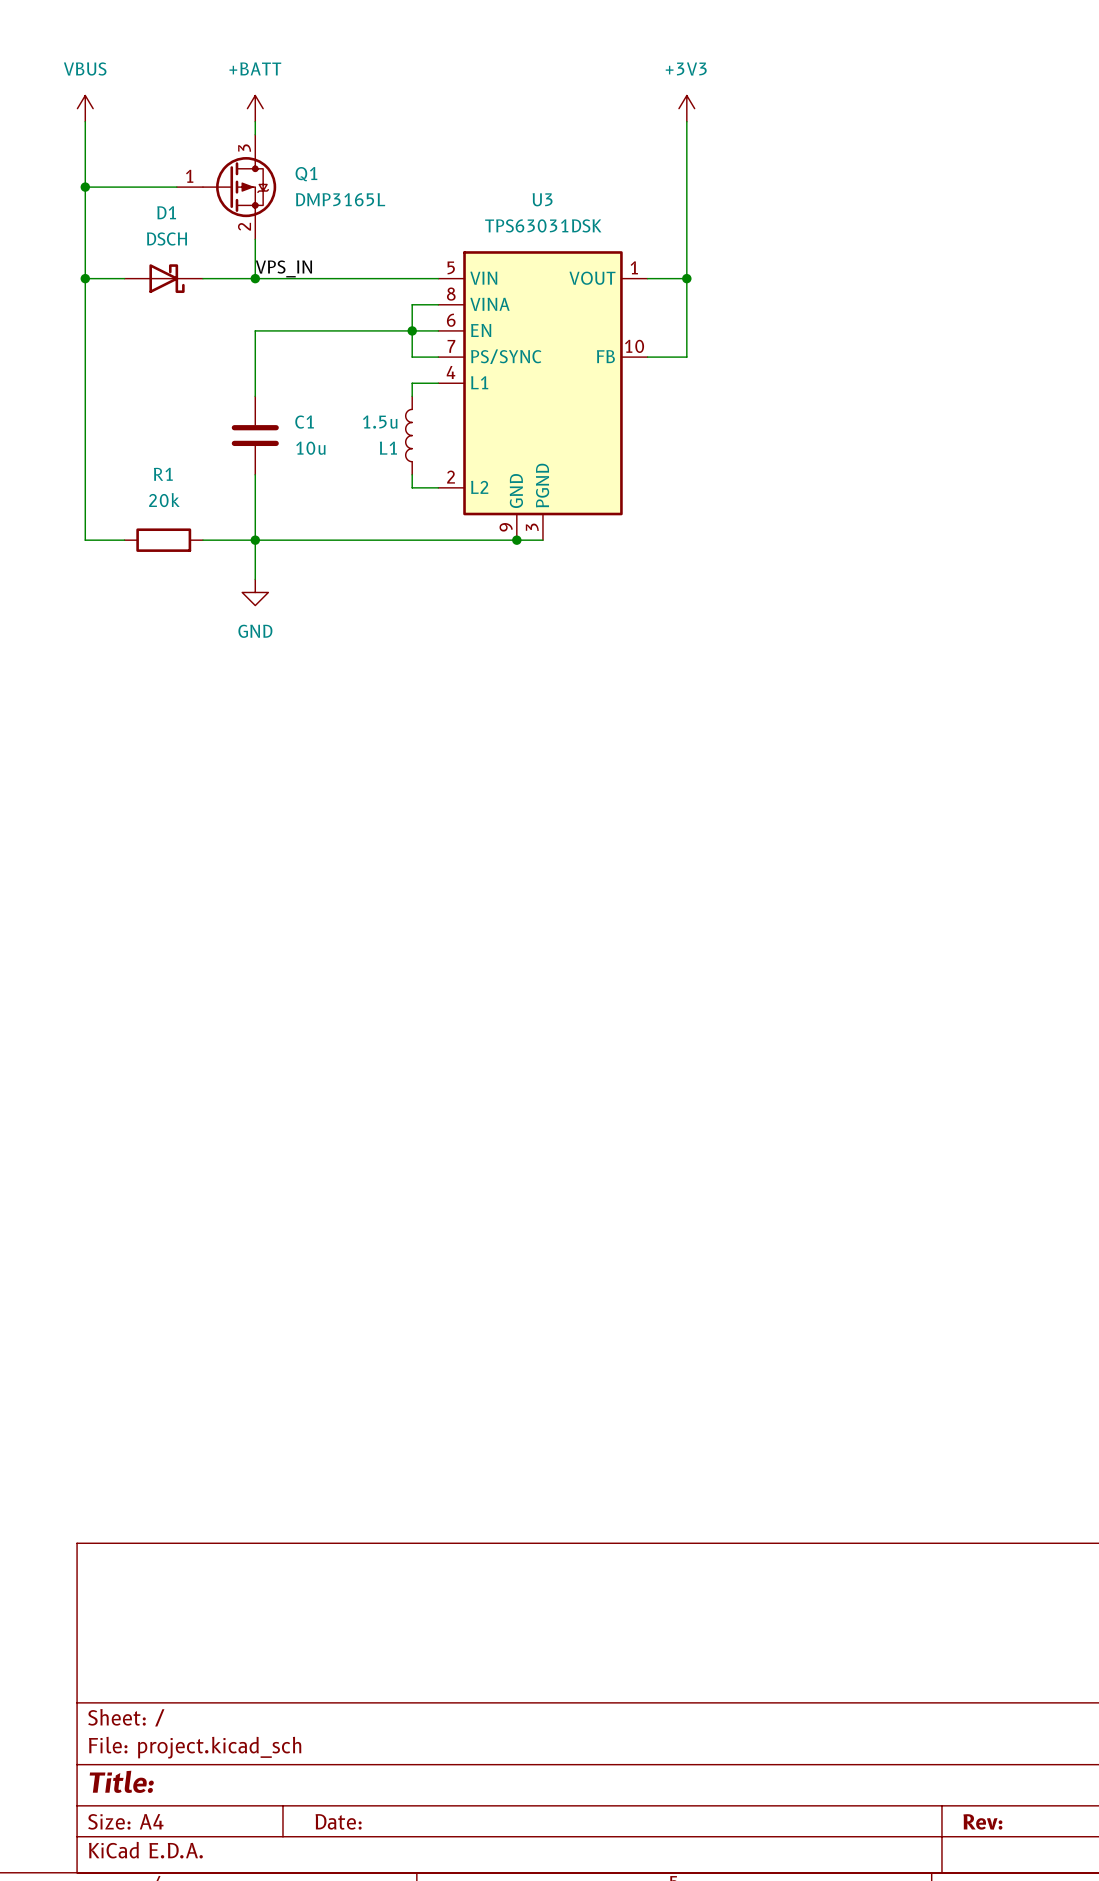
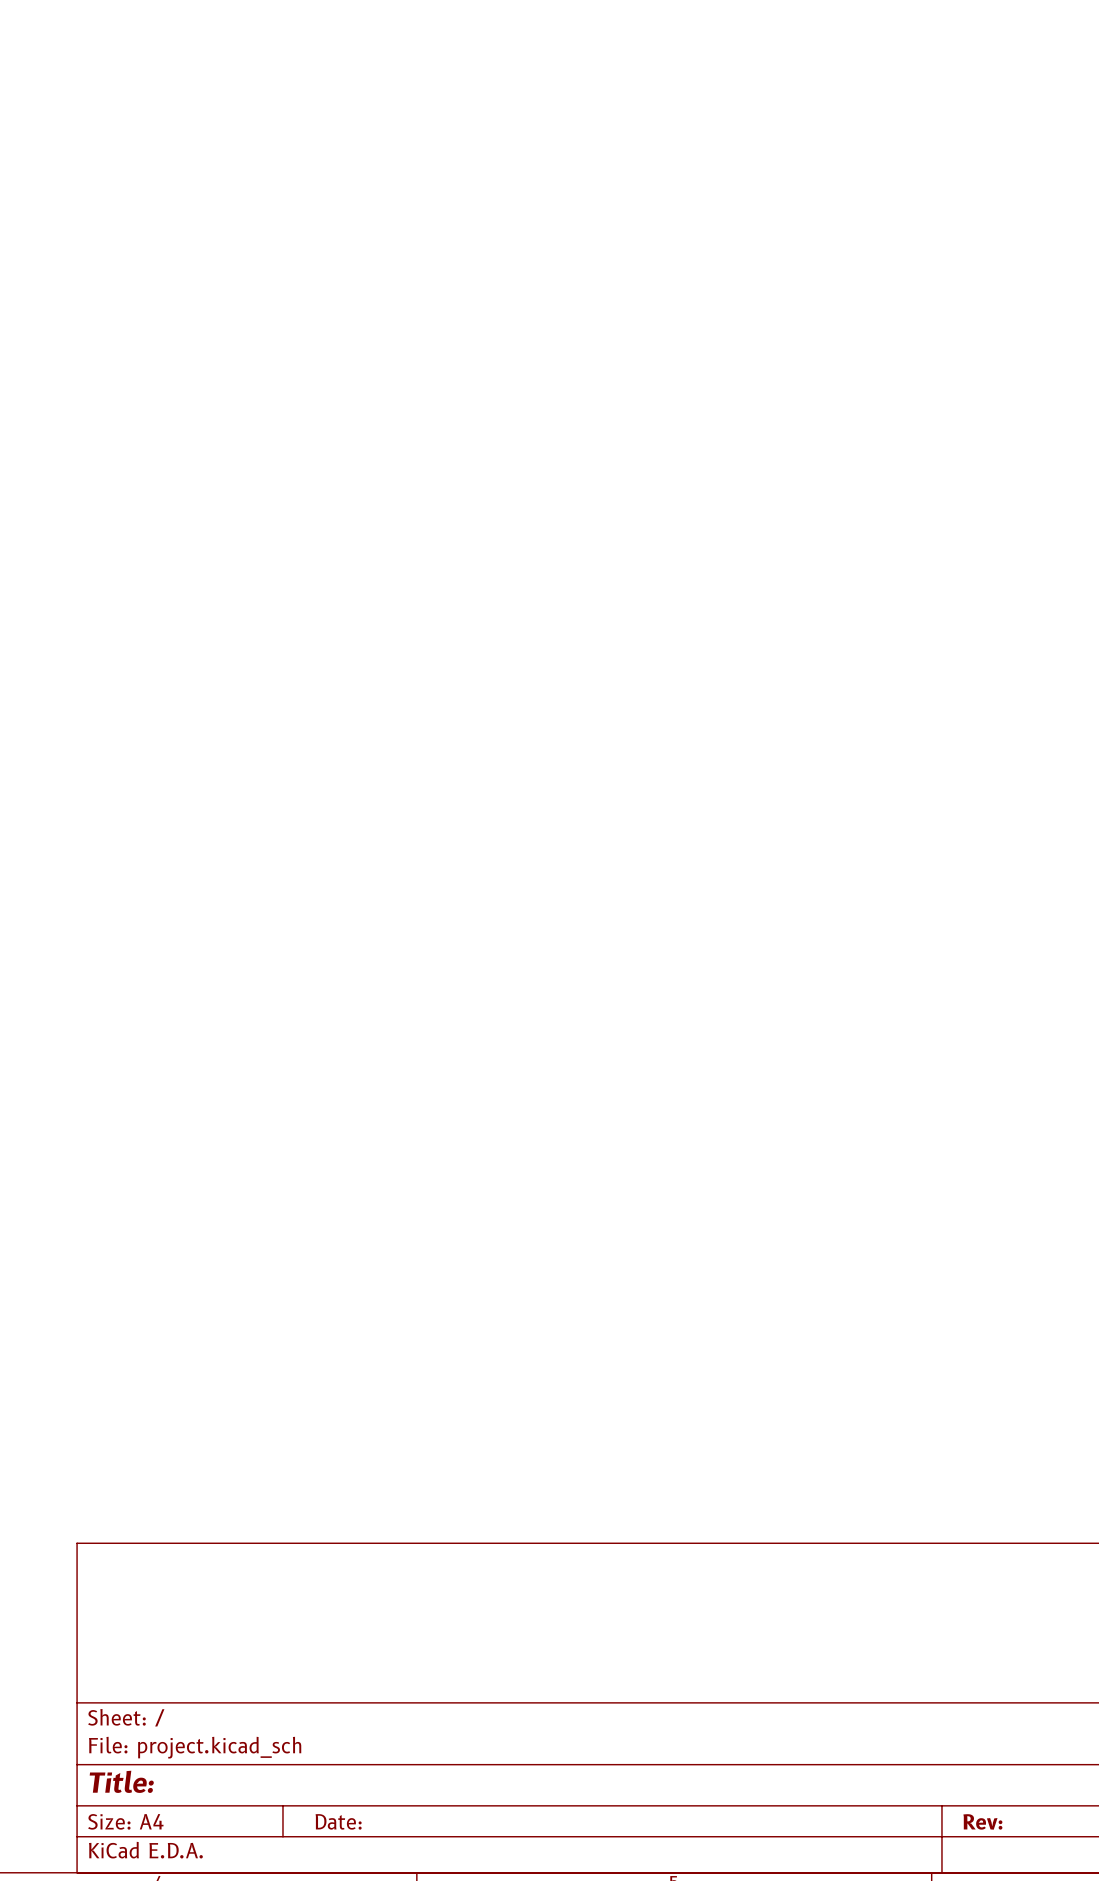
power symbol: VBUS (85, 108) -> none
power symbol: +BATT (255, 108) -> none
power symbol: +3V3 (686, 108) -> none
wire: (85, 121) (85, 540) (124, 540) -> none
wire: (255, 121) (255, 134) -> none
wire: (686, 121) (686, 357) (647, 357) -> none
wire: (85, 187) (176, 187) -> none
junction: (85, 187) -> none
Q1: DMP3165L (226, 187) -> none
wire: (255, 239) (255, 278) -> none
label: VPS_IN (283, 268) -> none
wire: (85, 278) (124, 278) -> none
junction: (85, 278) -> none
D1: DSCH (163, 278) -> none
wire: (202, 278) (438, 278) -> none
junction: (255, 278) -> none
wire: (647, 278) (686, 278) -> none
junction: (686, 278) -> none
wire: (438, 304) (412, 304) (412, 357) (438, 357) -> none
junction: (412, 330) -> none
wire: (438, 330) (255, 330) (255, 396) -> none
wire: (438, 383) (412, 383) (412, 396) -> none
U3: TPS63031DSK (542, 395) -> none
C1: 10u (255, 435) -> none
L1: 1.5u (408, 435) -> none
wire: (255, 474) (255, 579) -> none
wire: (412, 474) (412, 487) (438, 487) -> none
R1: 20k (163, 540) -> none
wire: (202, 540) (542, 540) -> none
junction: (255, 540) -> none
junction: (516, 540) -> none
power symbol: GND (255, 592) -> none

